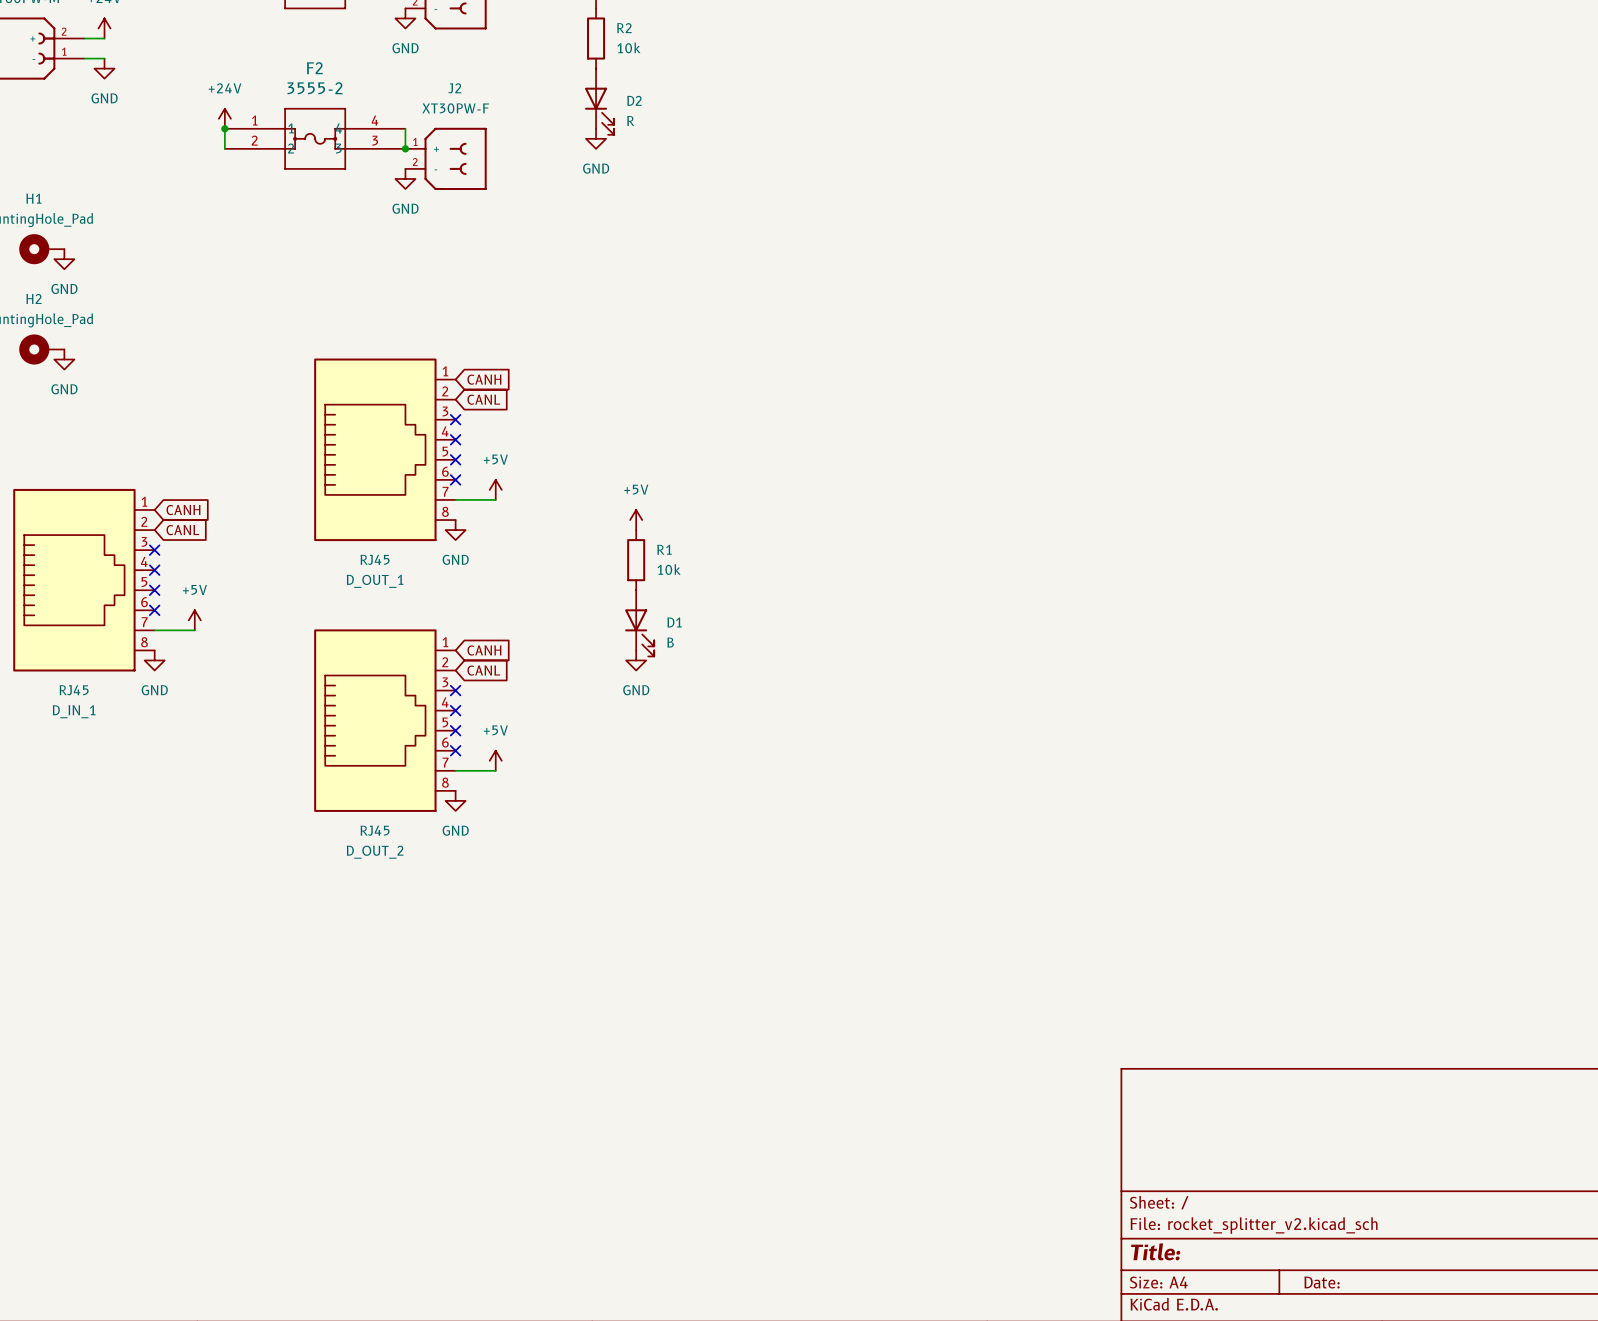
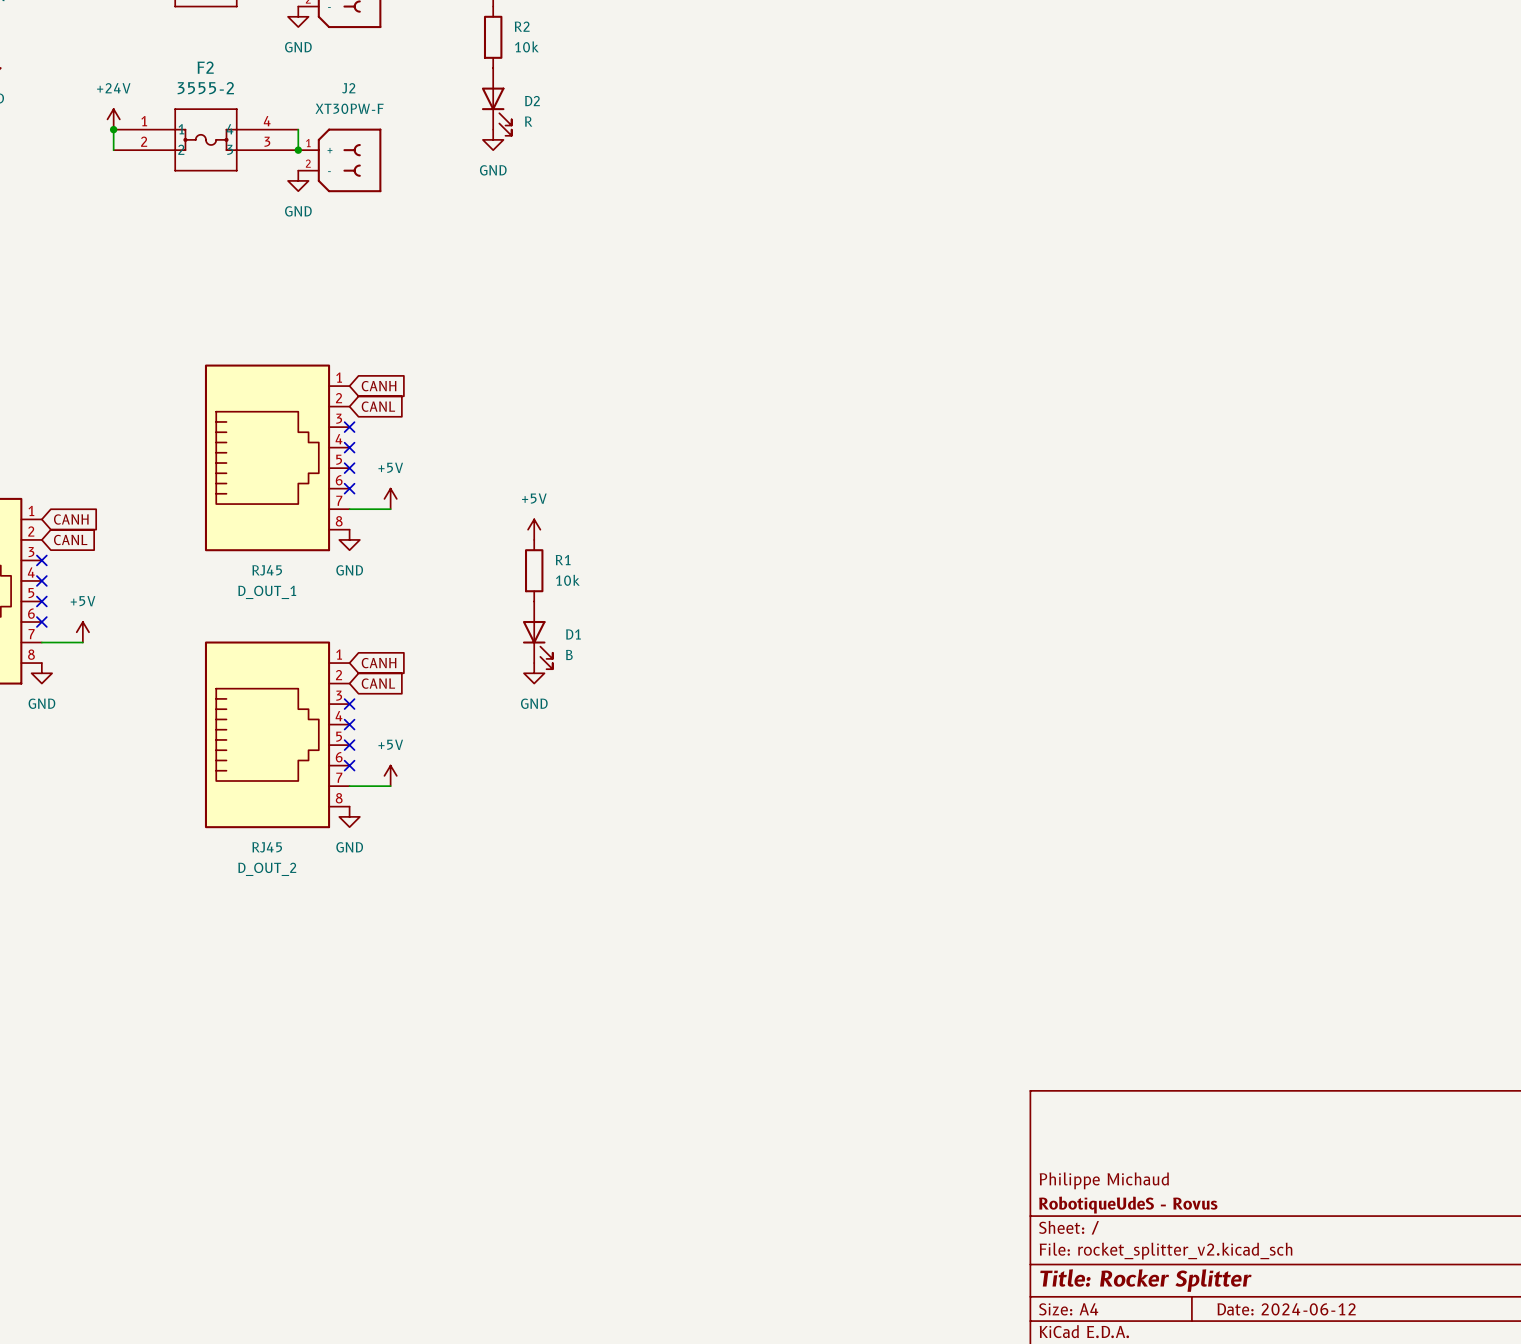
title block: none -> Philippe Michaud (1104, 1180)
title block: none -> RobotiqueUdeS - Rovus (1128, 1205)
title block: Title: (1155, 1251) -> Title: Rocker Splitter (1145, 1280)
title block: Date: (1322, 1282) -> Date: 2024-06-12 (1286, 1309)

